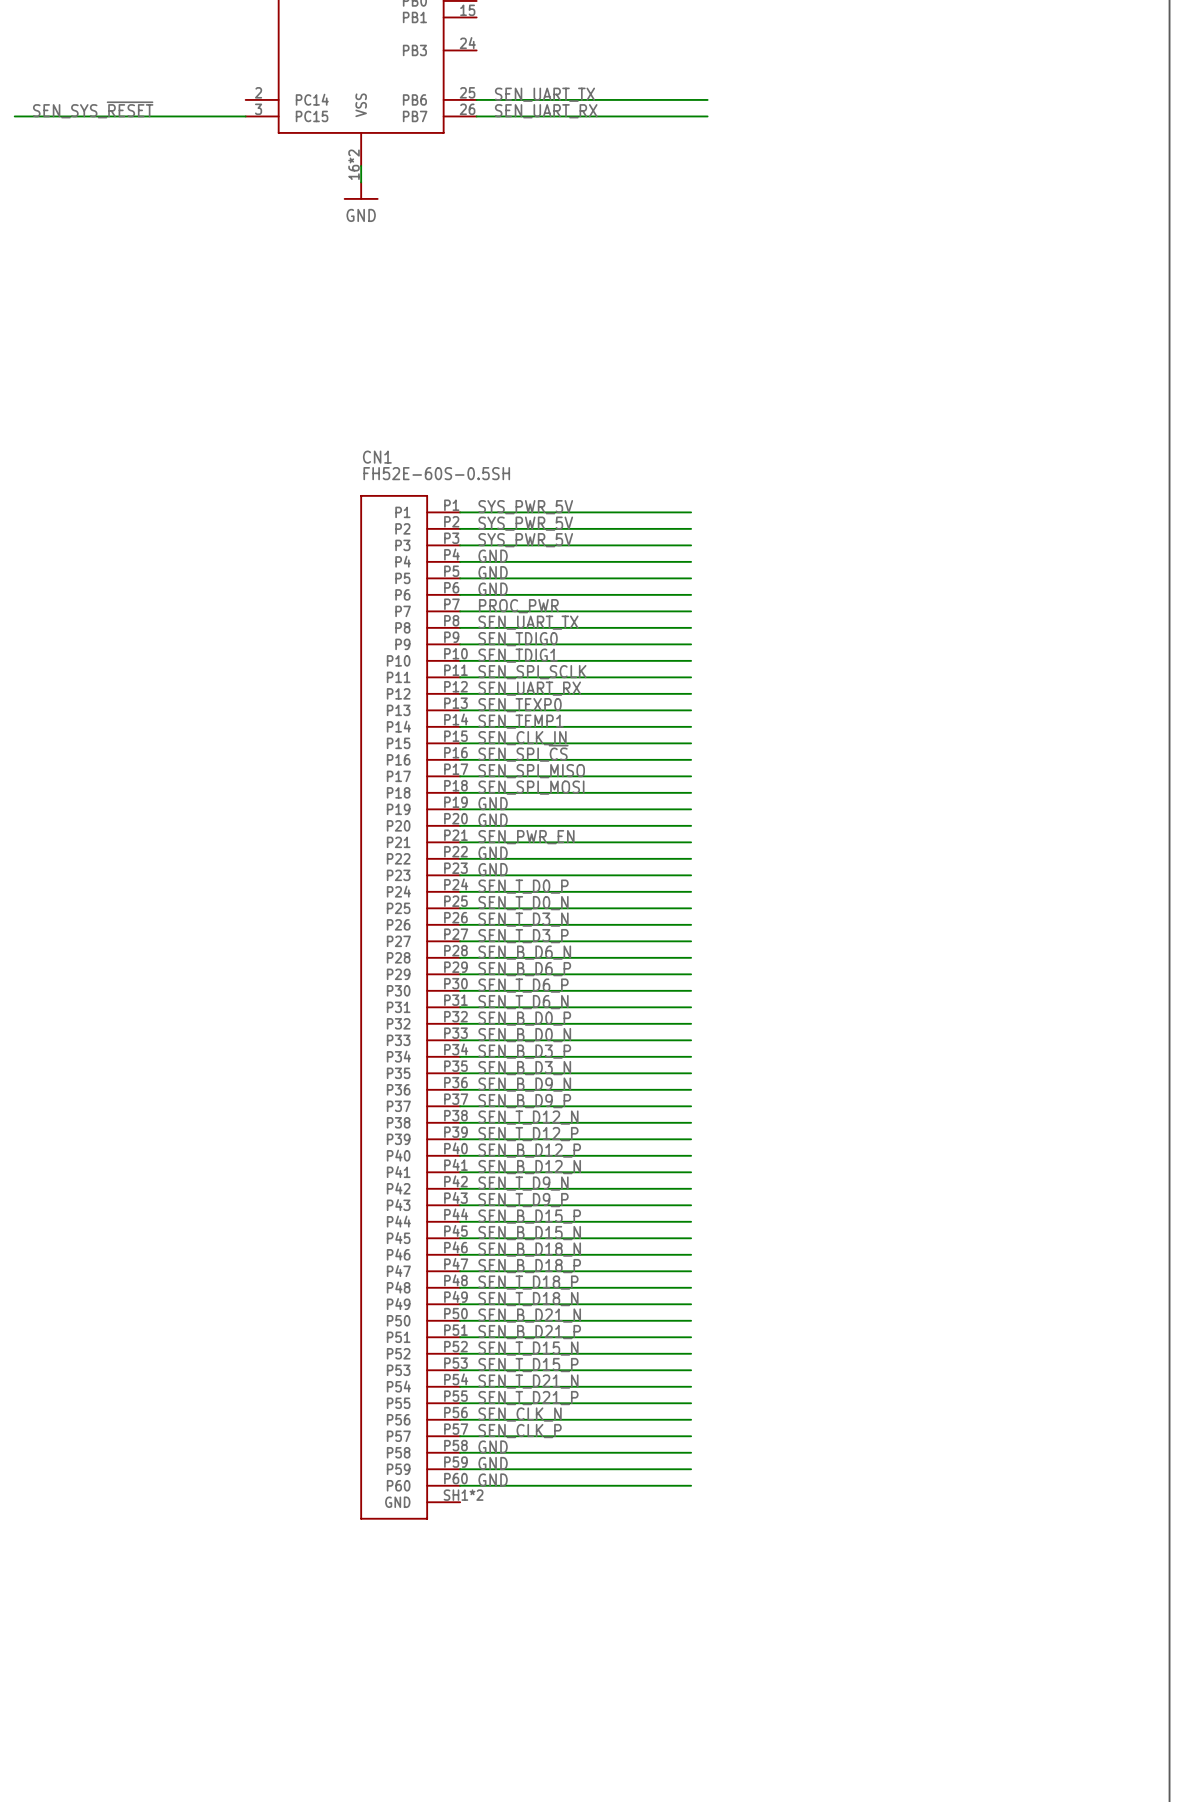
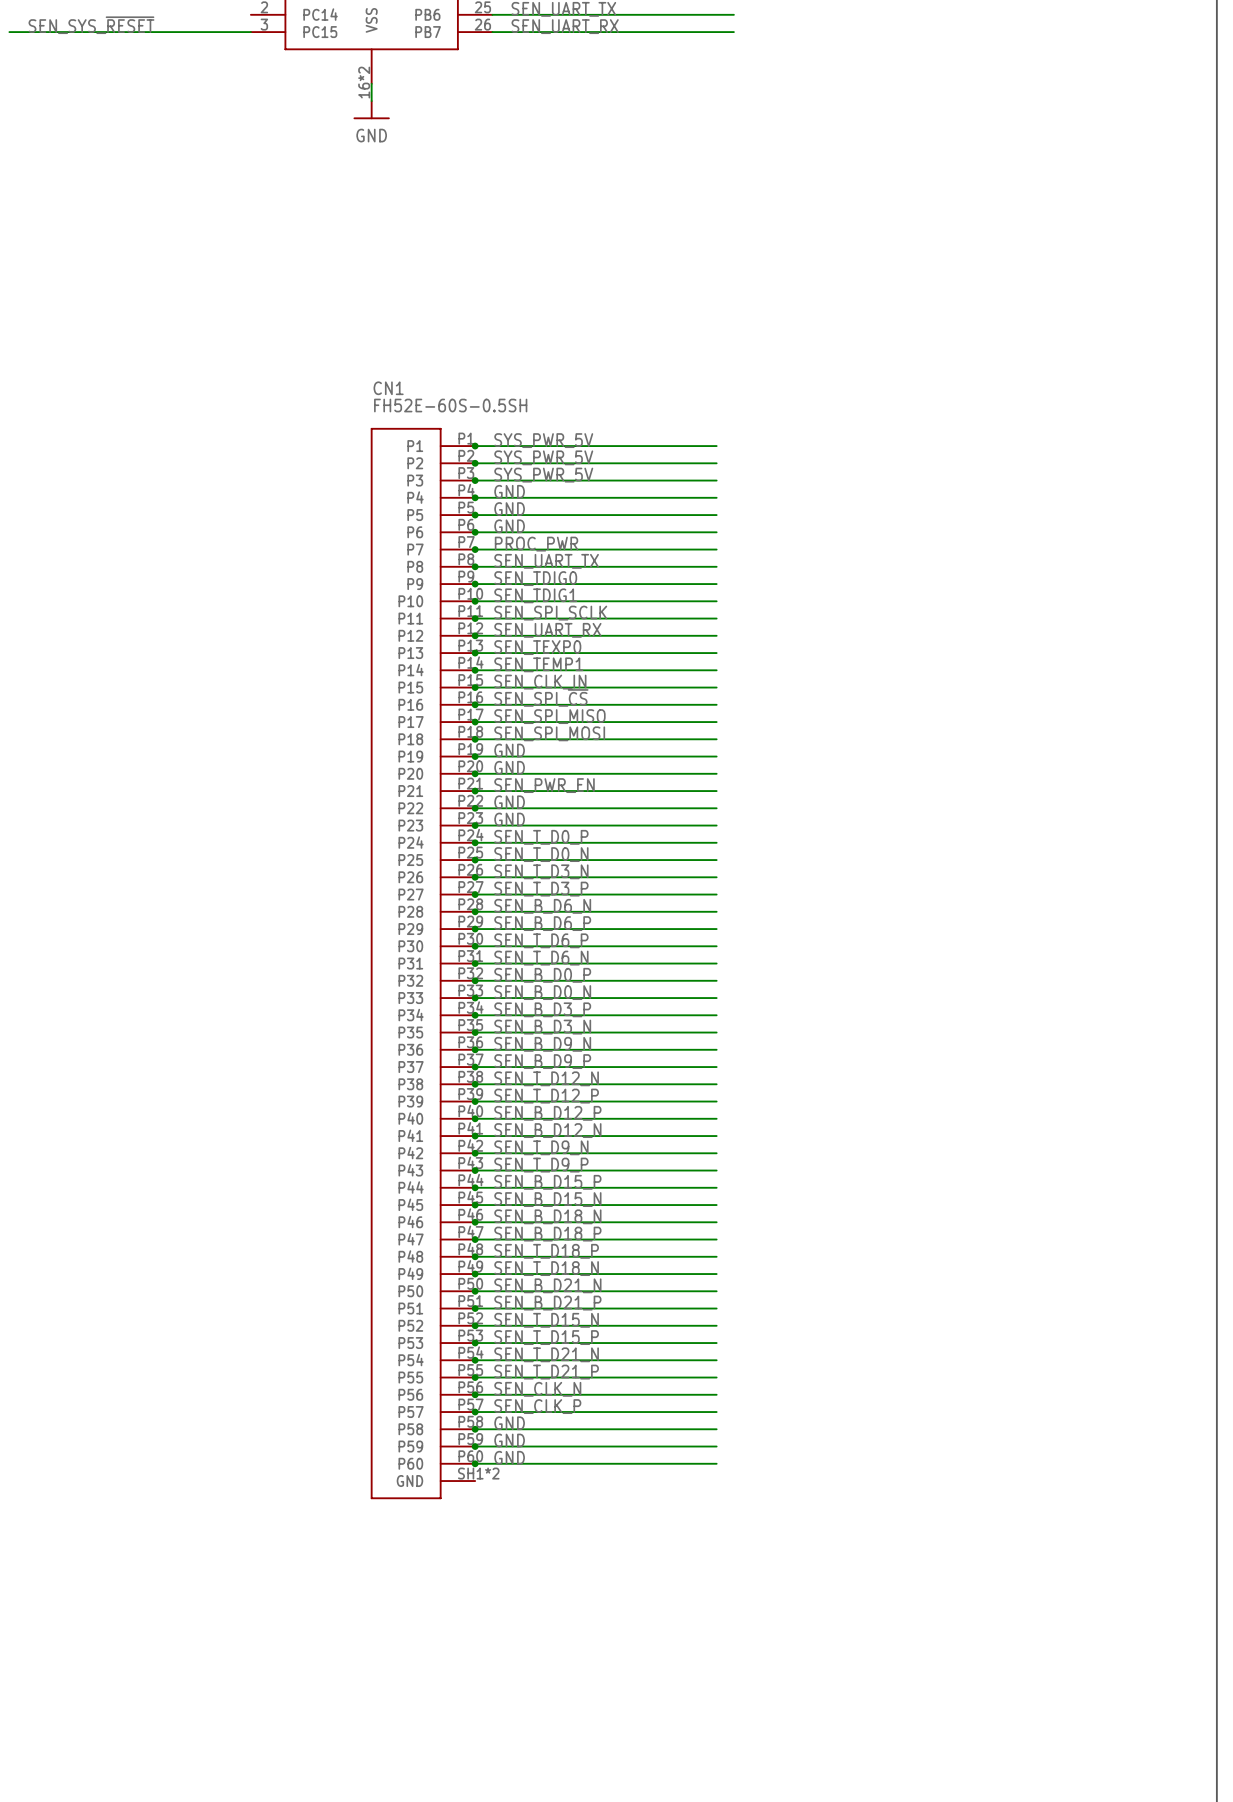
junction: none -> (475, 446)
junction: none -> (475, 463)
junction: none -> (475, 480)
junction: none -> (475, 497)
junction: none -> (475, 515)
junction: none -> (475, 532)
junction: none -> (475, 549)
junction: none -> (475, 566)
junction: none -> (475, 584)
junction: none -> (475, 601)
junction: none -> (475, 618)
junction: none -> (475, 635)
junction: none -> (475, 653)
junction: none -> (475, 670)
junction: none -> (475, 687)
junction: none -> (475, 704)
junction: none -> (475, 722)
junction: none -> (475, 739)
junction: none -> (475, 756)
junction: none -> (475, 773)
junction: none -> (475, 791)
junction: none -> (475, 808)
junction: none -> (475, 825)
junction: none -> (475, 842)
junction: none -> (475, 860)
junction: none -> (475, 877)
junction: none -> (475, 894)
junction: none -> (475, 911)
junction: none -> (475, 929)
junction: none -> (475, 946)
junction: none -> (475, 963)
junction: none -> (475, 980)
junction: none -> (475, 998)
junction: none -> (475, 1015)
junction: none -> (475, 1032)
junction: none -> (475, 1049)
junction: none -> (475, 1067)
junction: none -> (475, 1084)
junction: none -> (475, 1101)
junction: none -> (475, 1118)
junction: none -> (475, 1136)
junction: none -> (475, 1153)
junction: none -> (475, 1170)
junction: none -> (475, 1187)
junction: none -> (475, 1205)
junction: none -> (475, 1222)
junction: none -> (475, 1239)
junction: none -> (475, 1256)
junction: none -> (475, 1274)
junction: none -> (475, 1291)
junction: none -> (475, 1308)
junction: none -> (475, 1325)
junction: none -> (475, 1343)
junction: none -> (475, 1360)
junction: none -> (475, 1377)
junction: none -> (475, 1394)
junction: none -> (475, 1412)
junction: none -> (475, 1429)
junction: none -> (475, 1446)
junction: none -> (475, 1463)

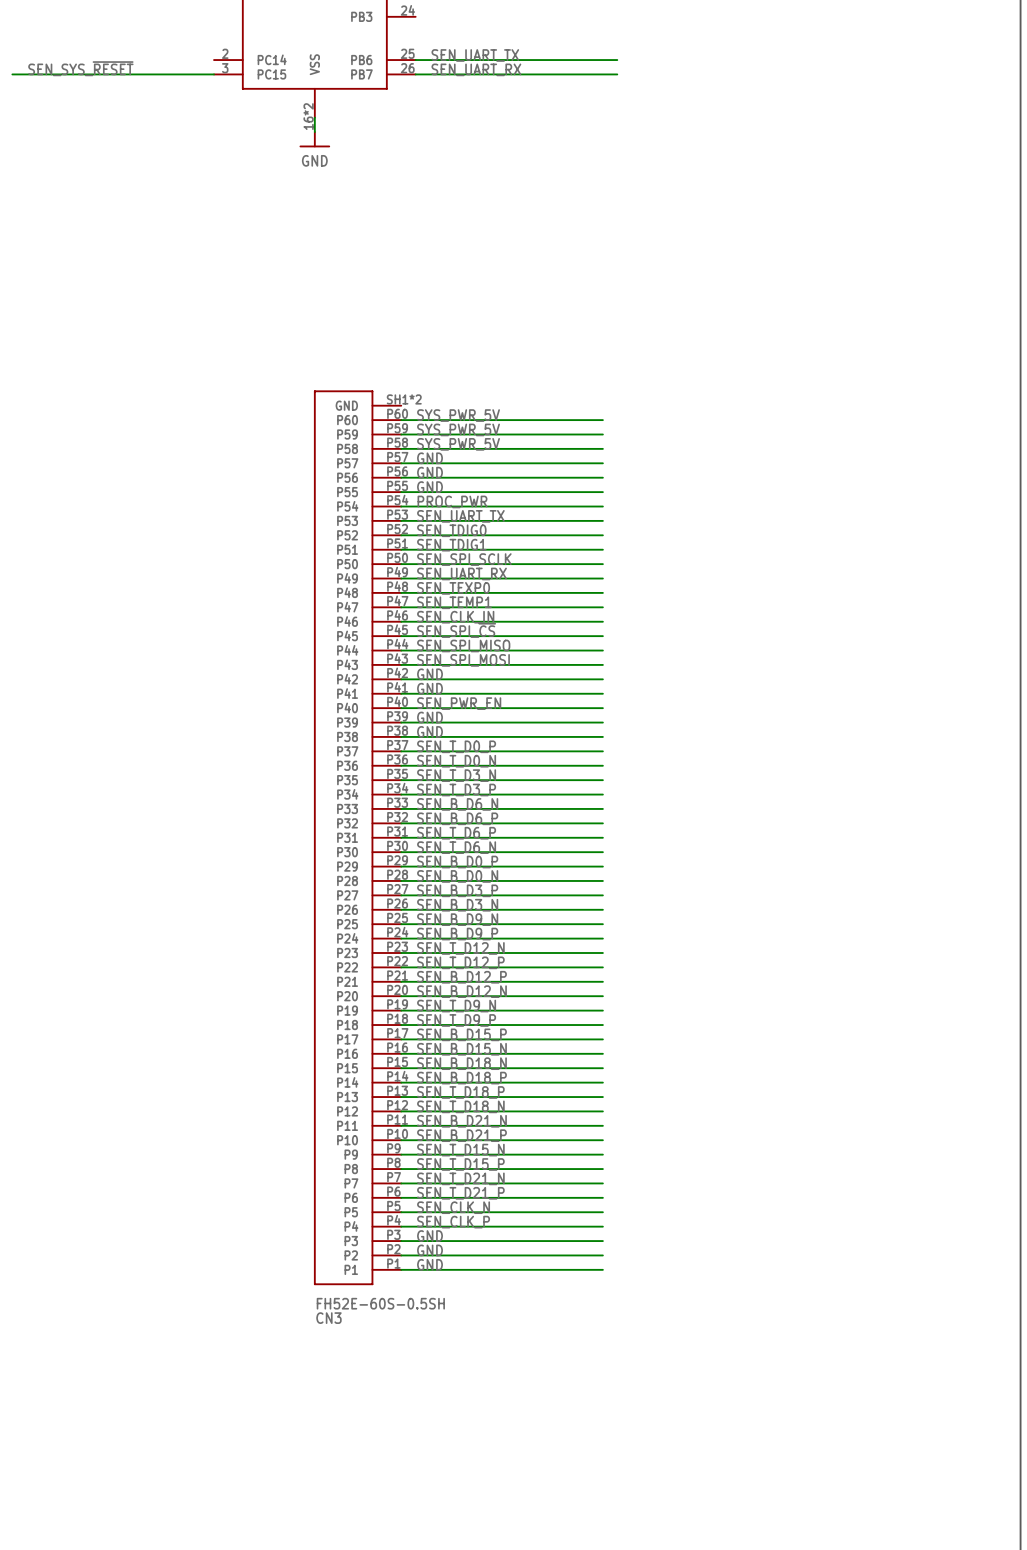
junction: (475, 446) -> none
junction: (475, 463) -> none
junction: (475, 480) -> none
junction: (475, 497) -> none
junction: (475, 515) -> none
junction: (475, 532) -> none
junction: (475, 549) -> none
junction: (475, 566) -> none
junction: (475, 584) -> none
junction: (475, 601) -> none
junction: (475, 618) -> none
junction: (475, 635) -> none
junction: (475, 653) -> none
junction: (475, 670) -> none
junction: (475, 687) -> none
junction: (475, 704) -> none
junction: (475, 722) -> none
junction: (475, 739) -> none
junction: (475, 756) -> none
junction: (475, 773) -> none
junction: (475, 791) -> none
junction: (475, 808) -> none
junction: (475, 825) -> none
junction: (475, 842) -> none
junction: (475, 860) -> none
junction: (475, 877) -> none
junction: (475, 894) -> none
junction: (475, 911) -> none
junction: (475, 929) -> none
CN3: none -> FH52E-60S-0.5SH (357, 837)
junction: (475, 946) -> none
CN1: FH52E-60S-0.5SH (422, 963) -> none
junction: (475, 963) -> none
junction: (475, 980) -> none
junction: (475, 998) -> none
junction: (475, 1015) -> none
junction: (475, 1032) -> none
junction: (475, 1049) -> none
junction: (475, 1067) -> none
junction: (475, 1084) -> none
junction: (475, 1101) -> none
junction: (475, 1118) -> none
junction: (475, 1136) -> none
junction: (475, 1153) -> none
junction: (475, 1170) -> none
junction: (475, 1187) -> none
junction: (475, 1205) -> none
junction: (475, 1222) -> none
junction: (475, 1239) -> none
junction: (475, 1256) -> none
junction: (475, 1274) -> none
junction: (475, 1291) -> none
junction: (475, 1308) -> none
junction: (475, 1325) -> none
junction: (475, 1343) -> none
junction: (475, 1360) -> none
junction: (475, 1377) -> none
junction: (475, 1394) -> none
junction: (475, 1412) -> none
junction: (475, 1429) -> none
junction: (475, 1446) -> none
junction: (475, 1463) -> none

